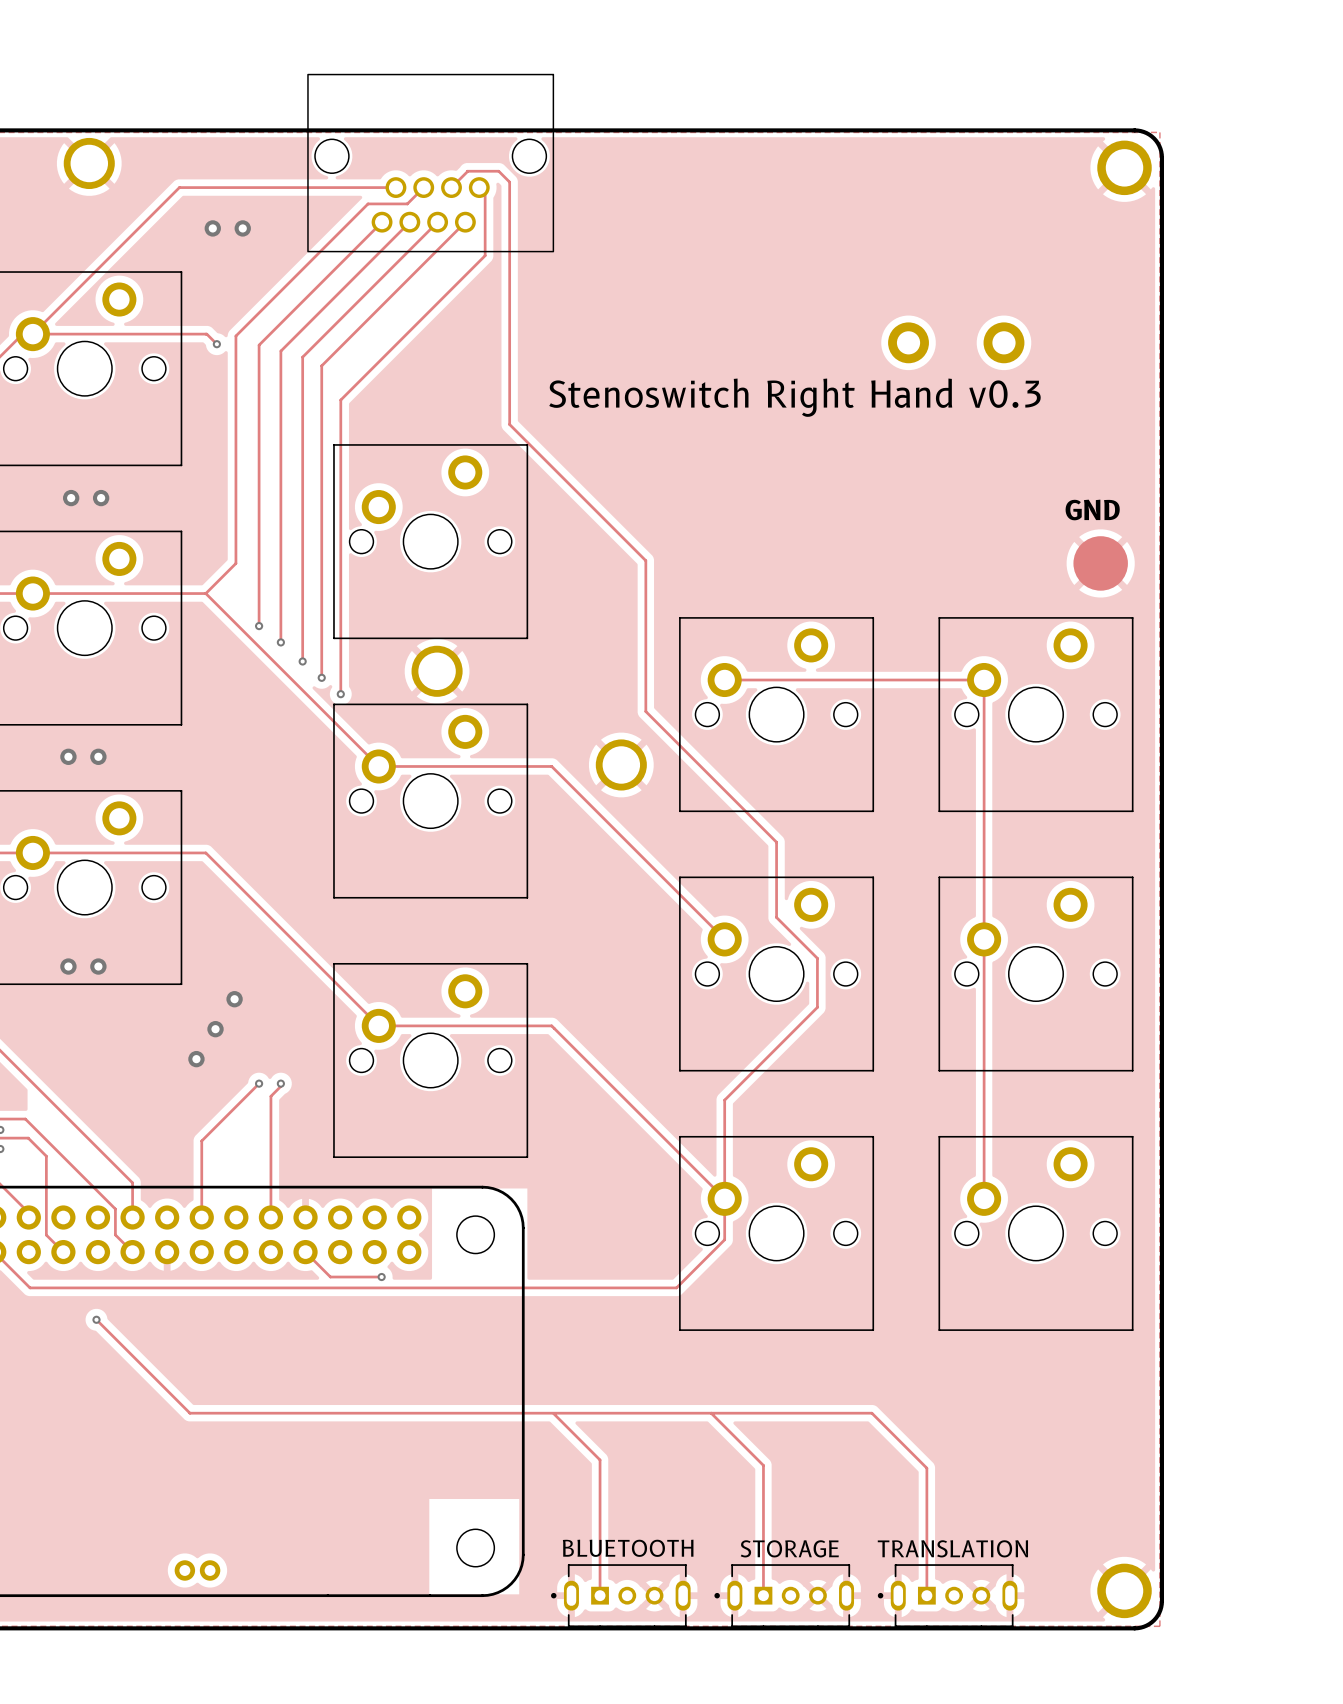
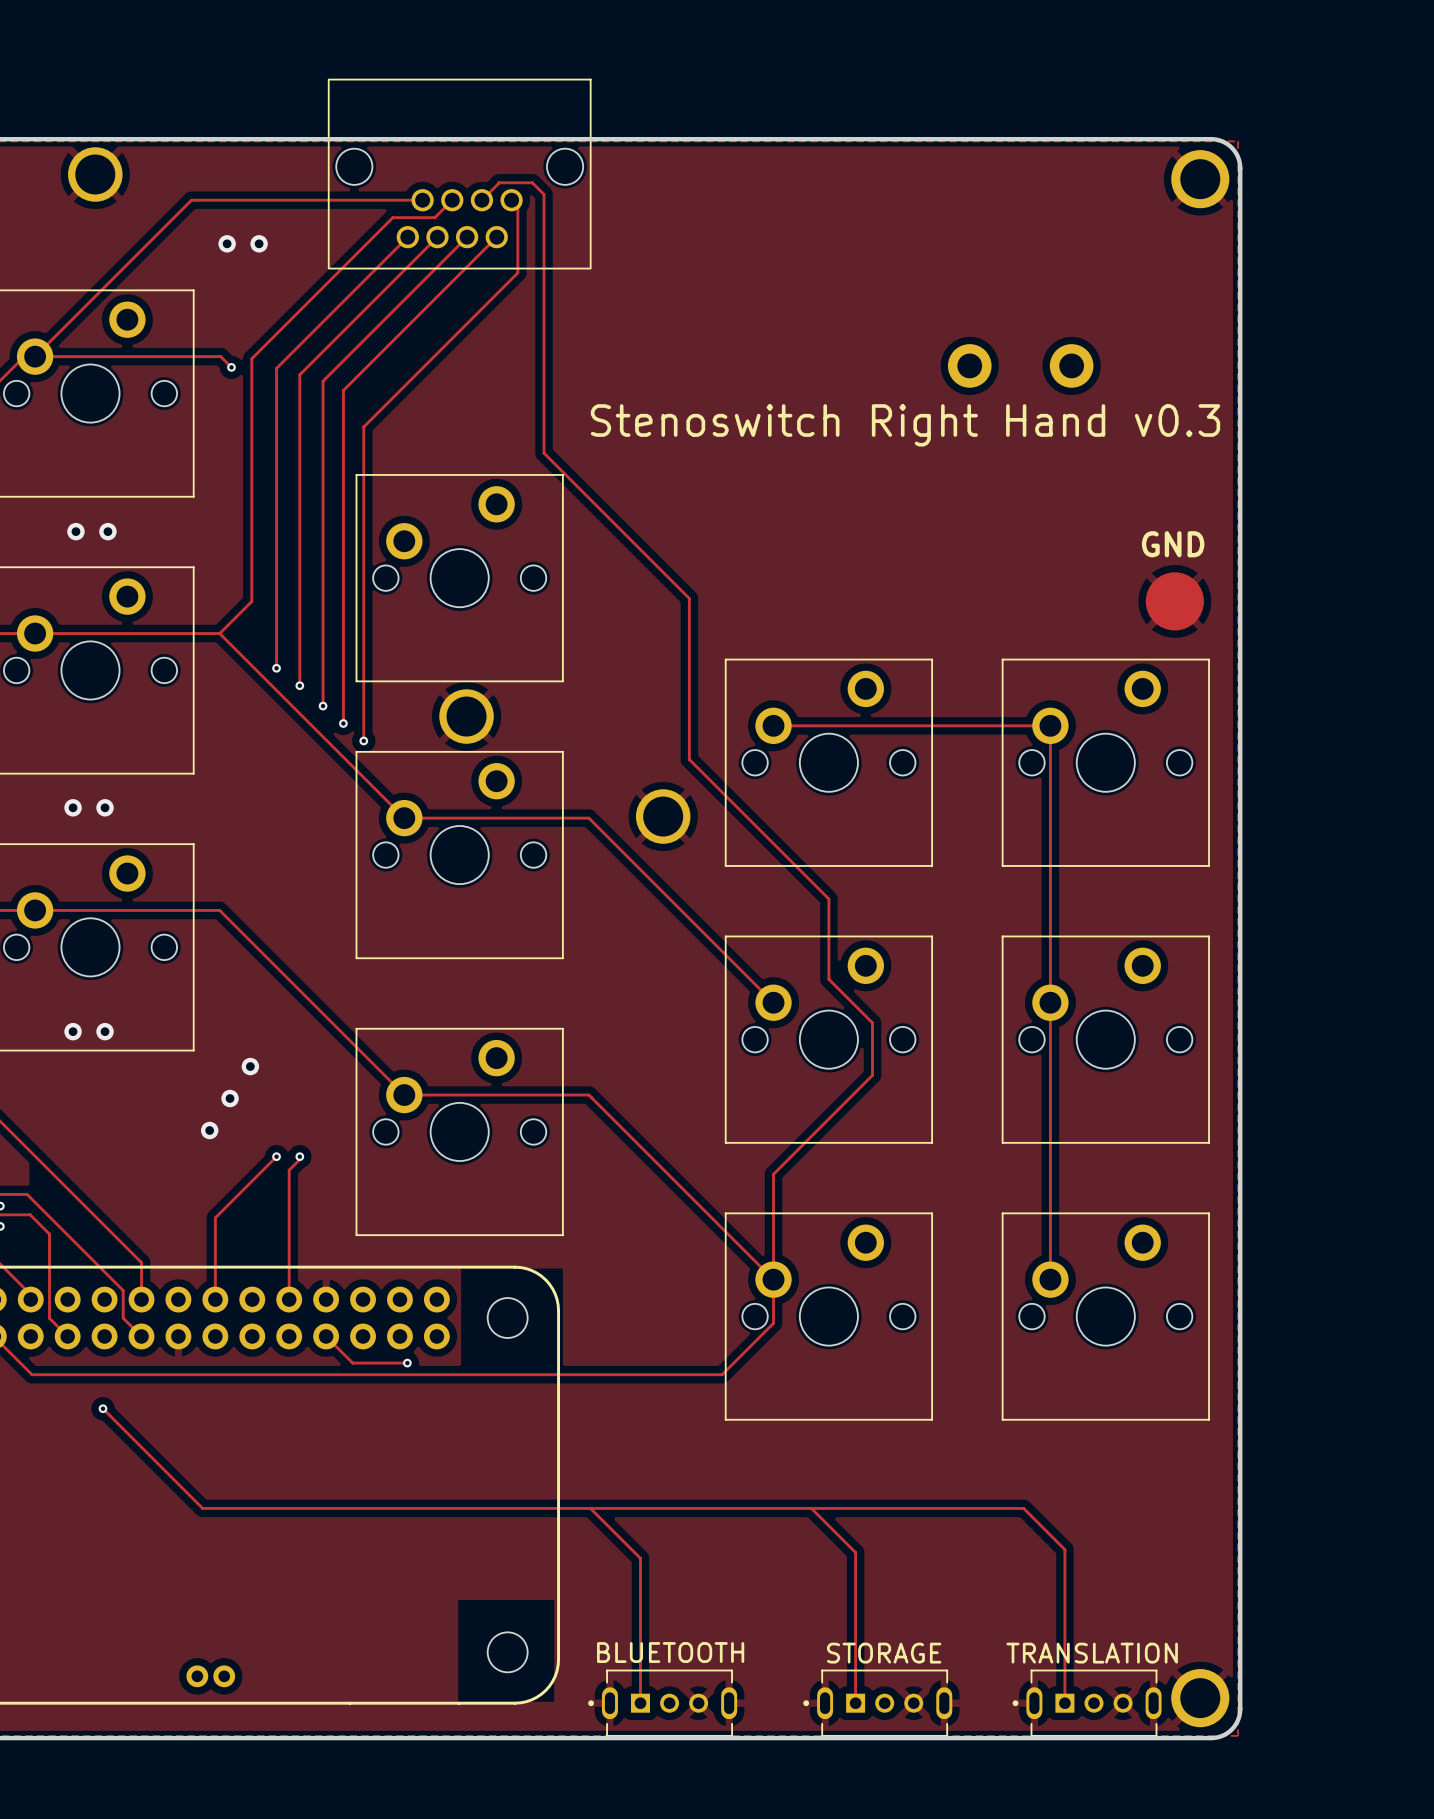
track: (711, 1413) (763, 1465) (763, 1595) -> none
track: none -> (811, 1508) (855, 1552) (855, 1703)
track: (871, 1413) (926, 1468) (926, 1595) -> (930, 1508) (1023, 1508) (1064, 1549) (1064, 1703)
STORAGE position: (784, 1595) -> (877, 1703)
TRANSLATION position: (947, 1595) -> (1087, 1703)

